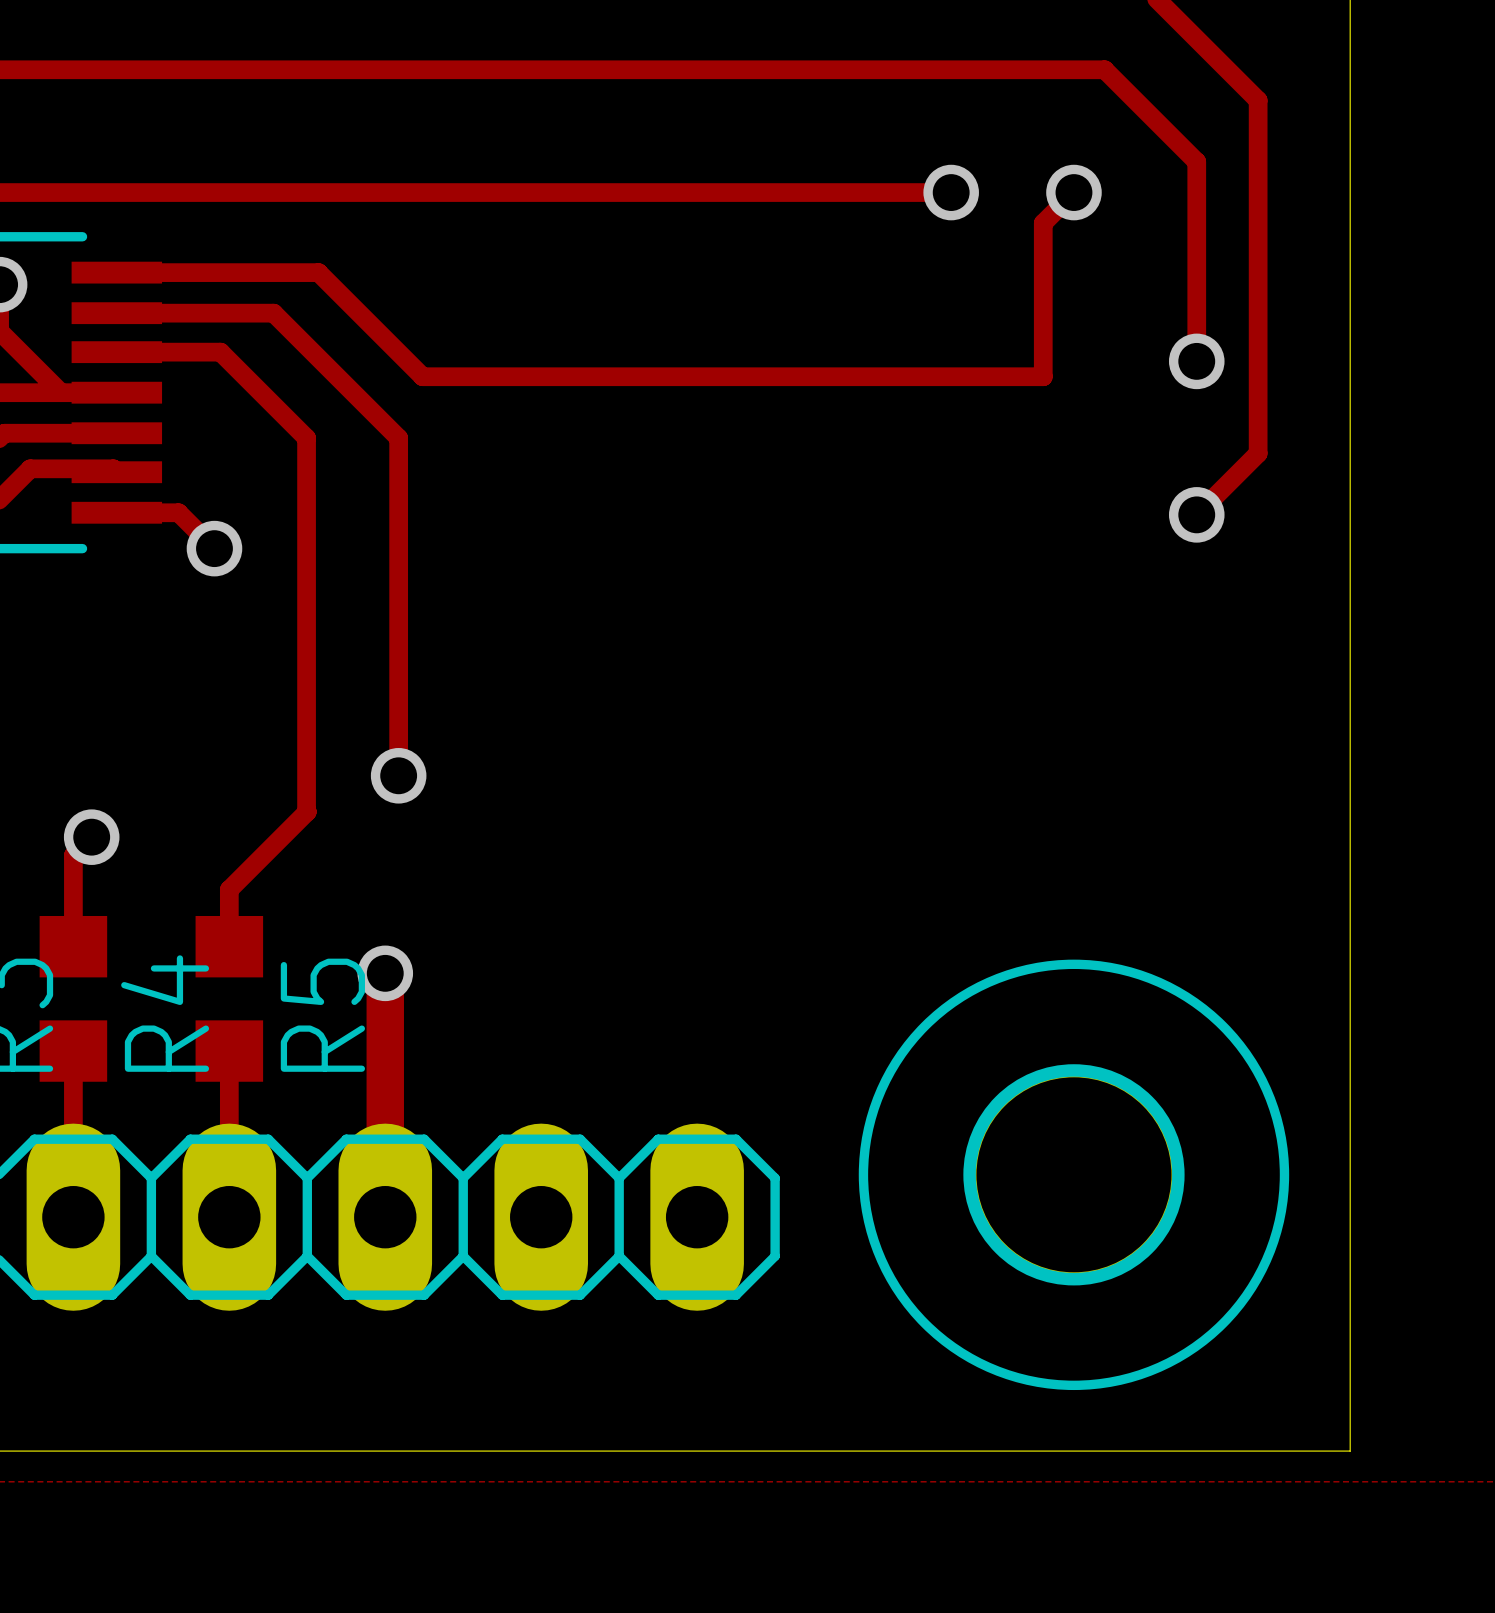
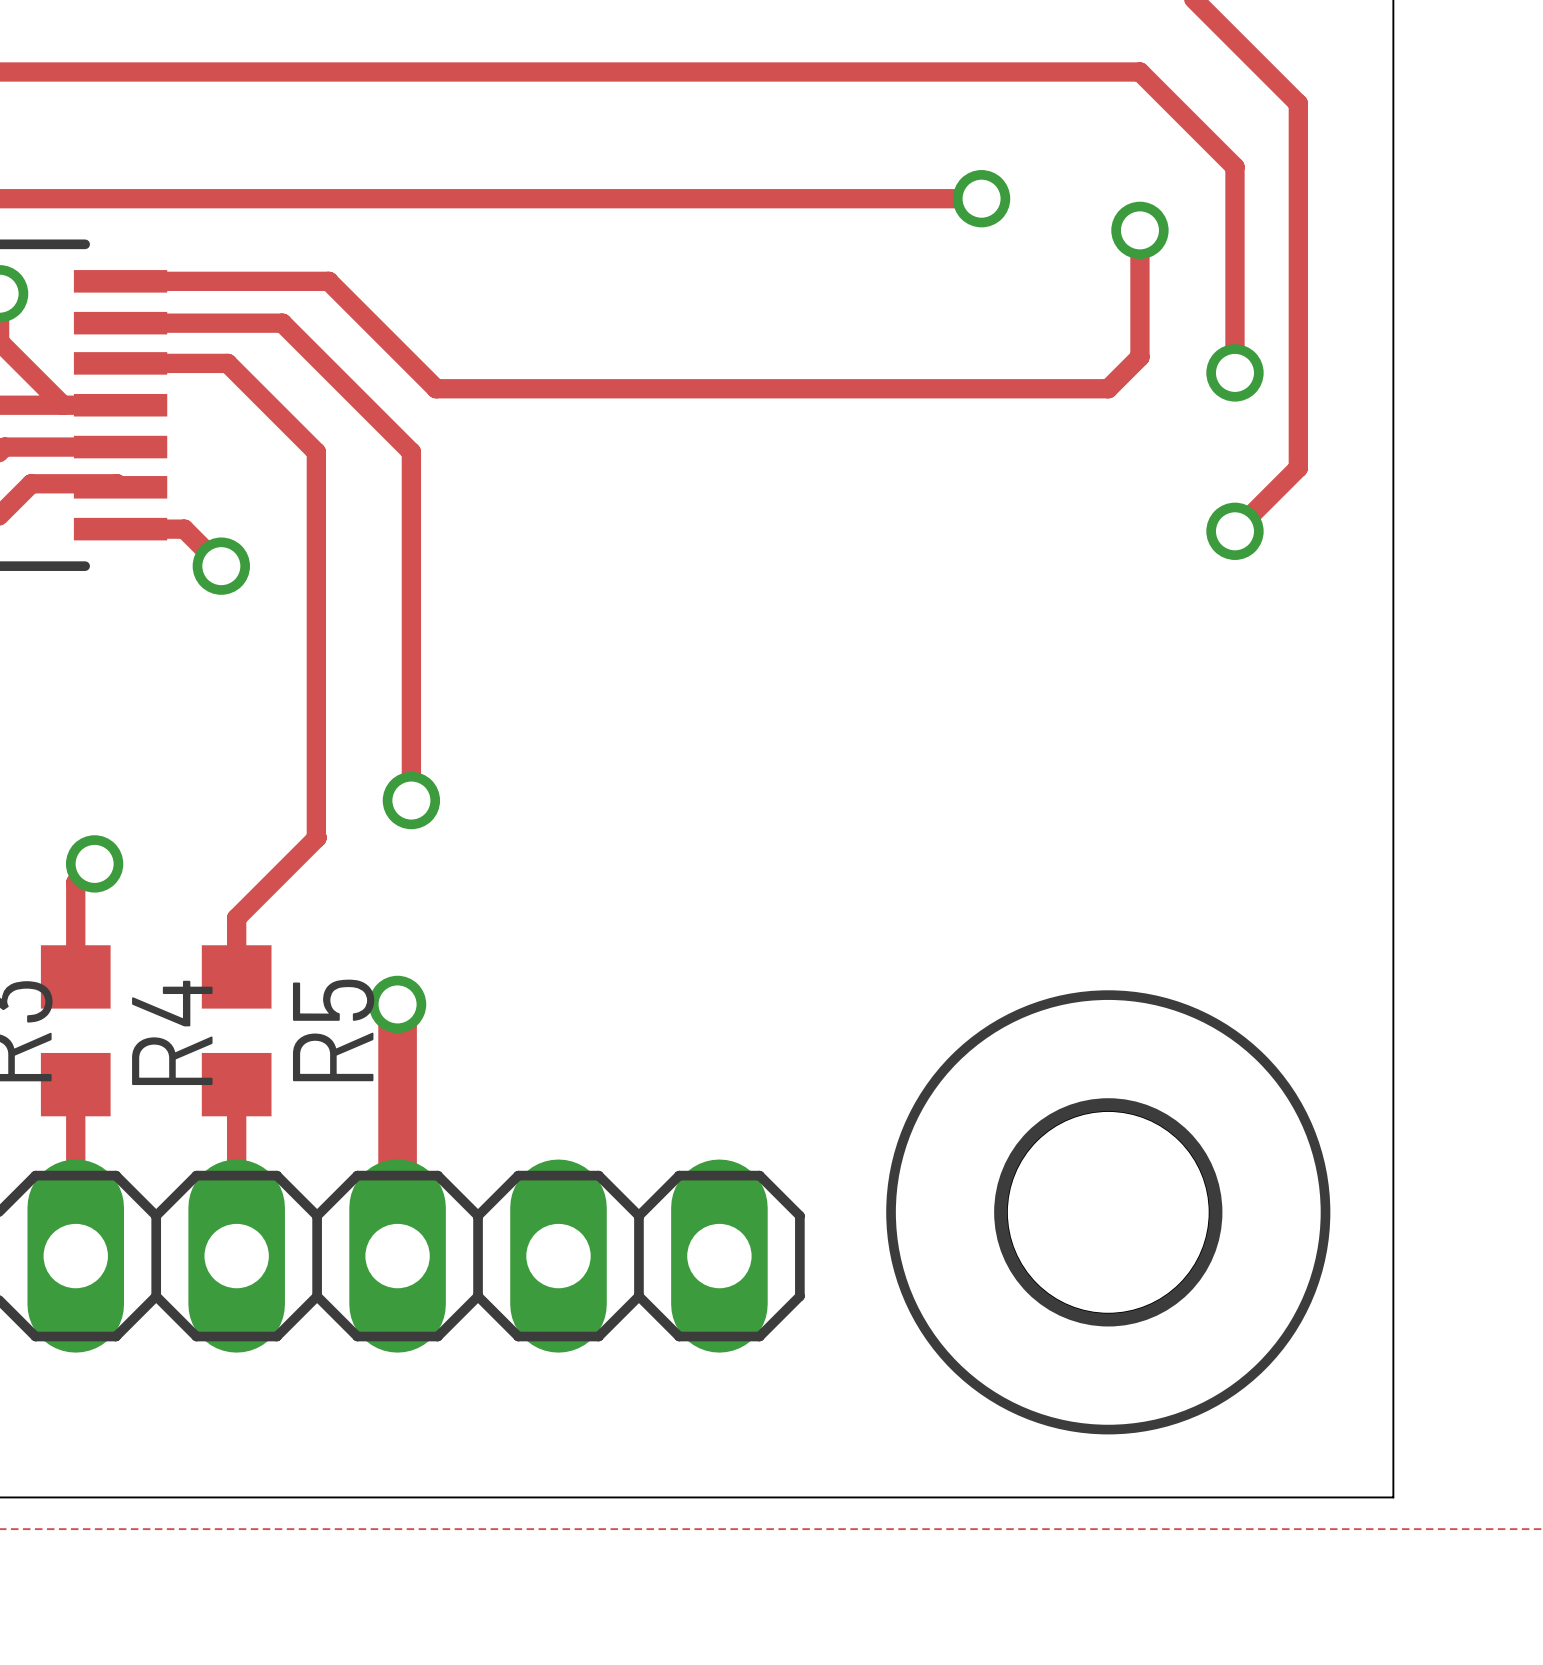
track: (1073, 192) (1043, 223) (1043, 376) -> (1139, 230) (1139, 357) (1108, 388) (1076, 388)
via position: (1073, 192) -> (1139, 230)

